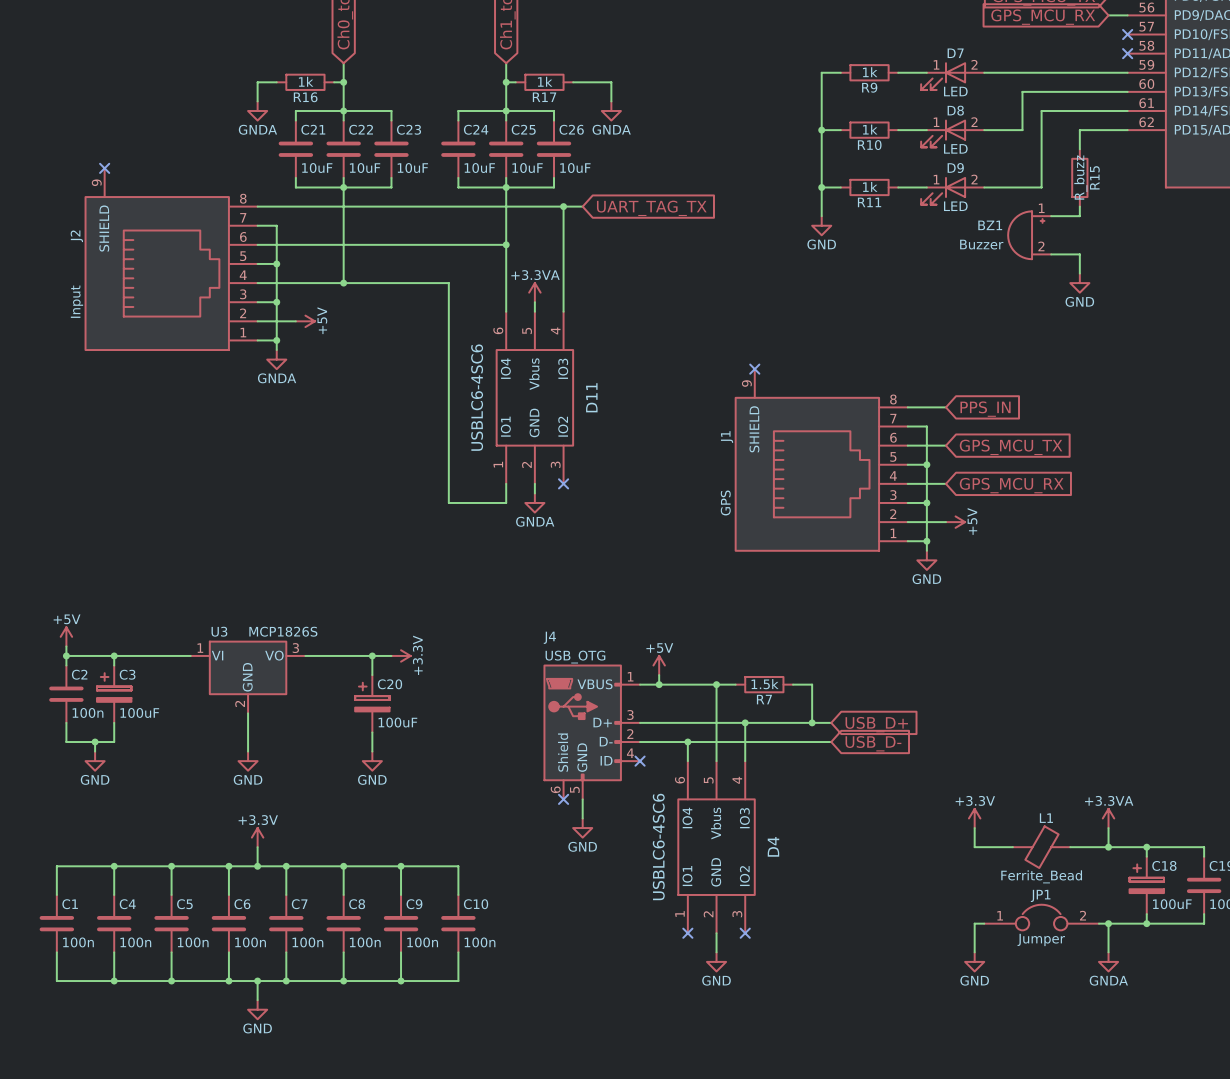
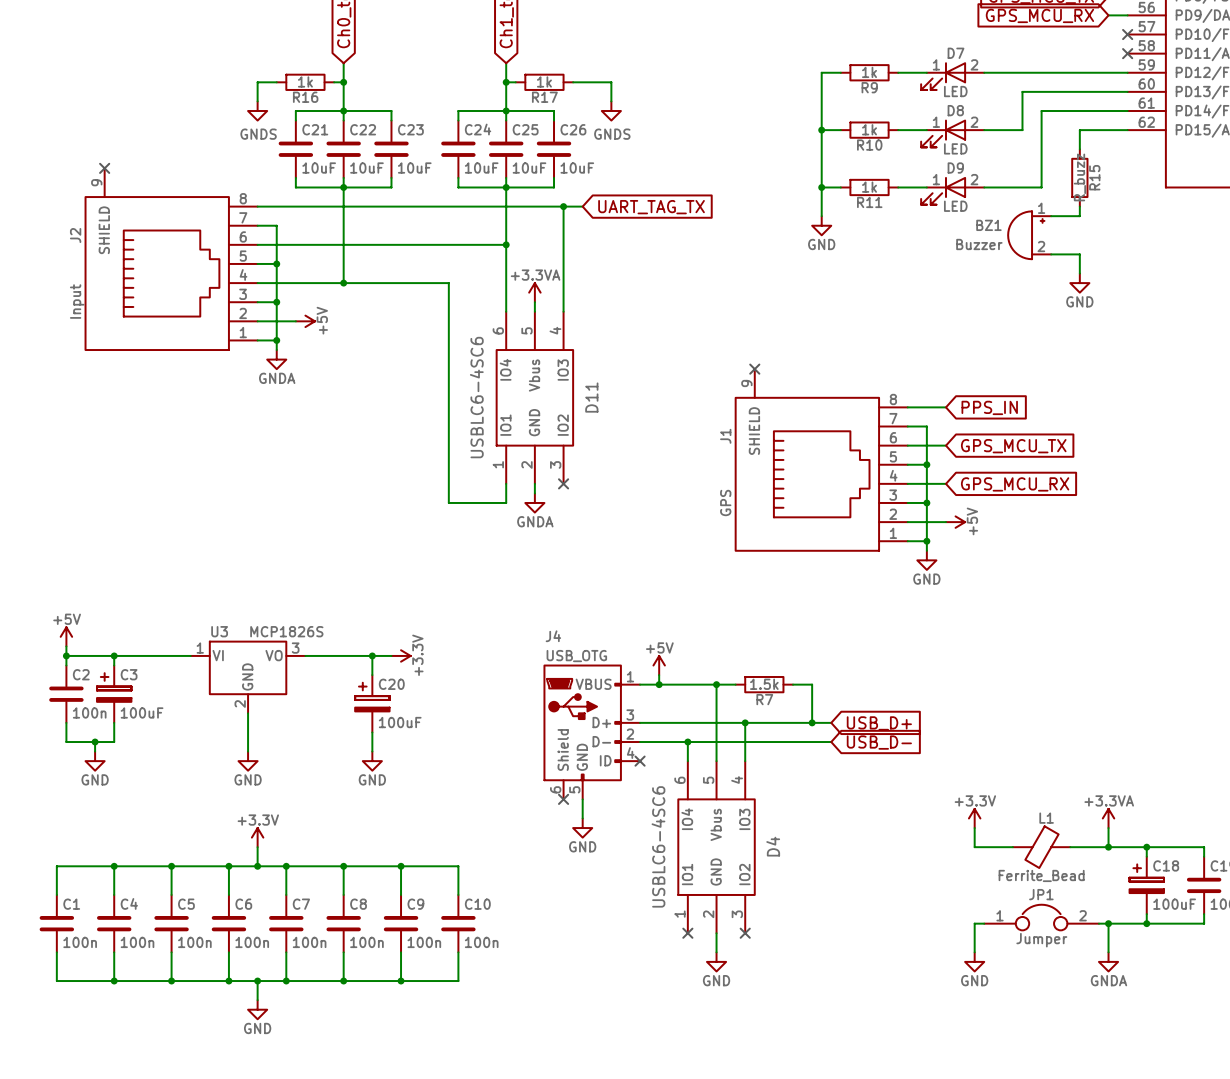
power symbol: GNDA (257, 111) -> GNDS (257, 111)
power symbol: GNDA (611, 111) -> GNDS (611, 111)

